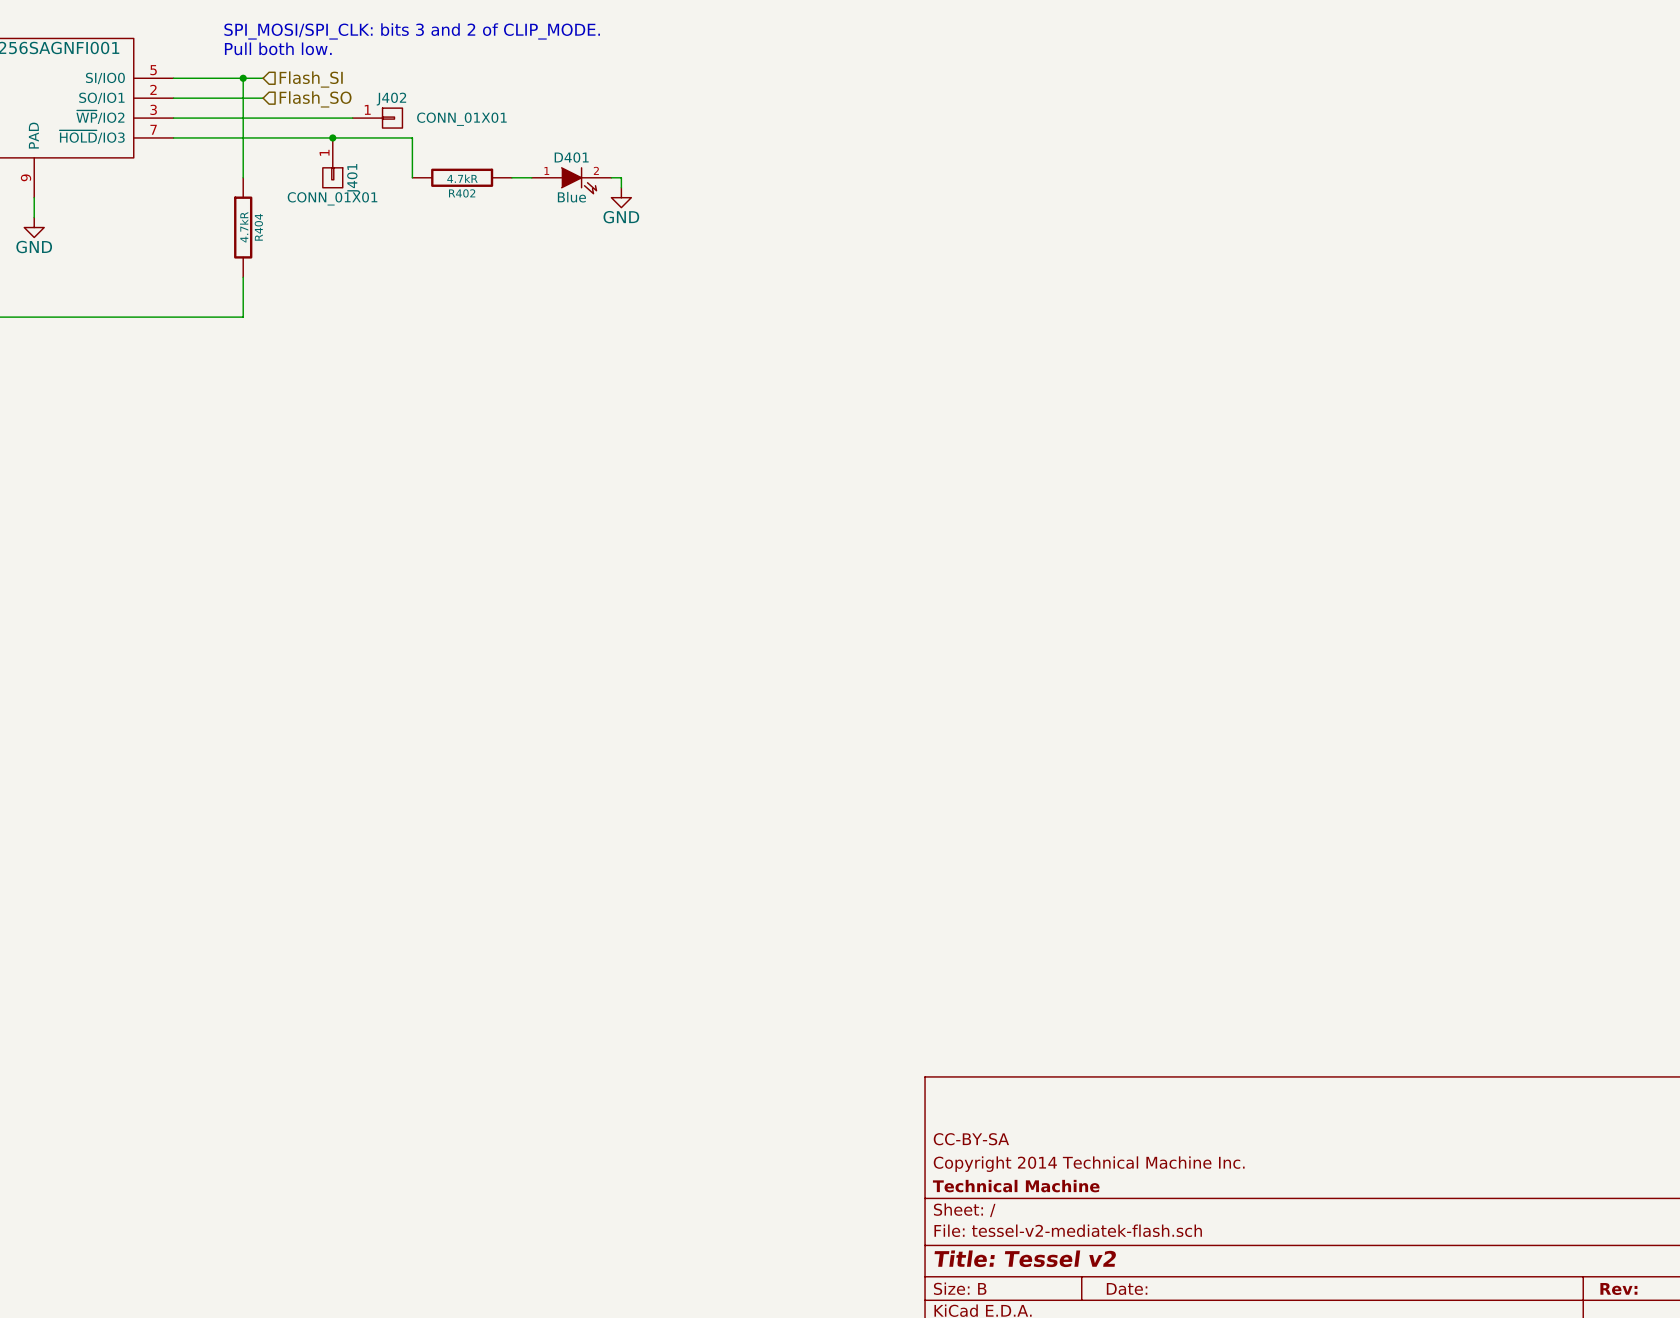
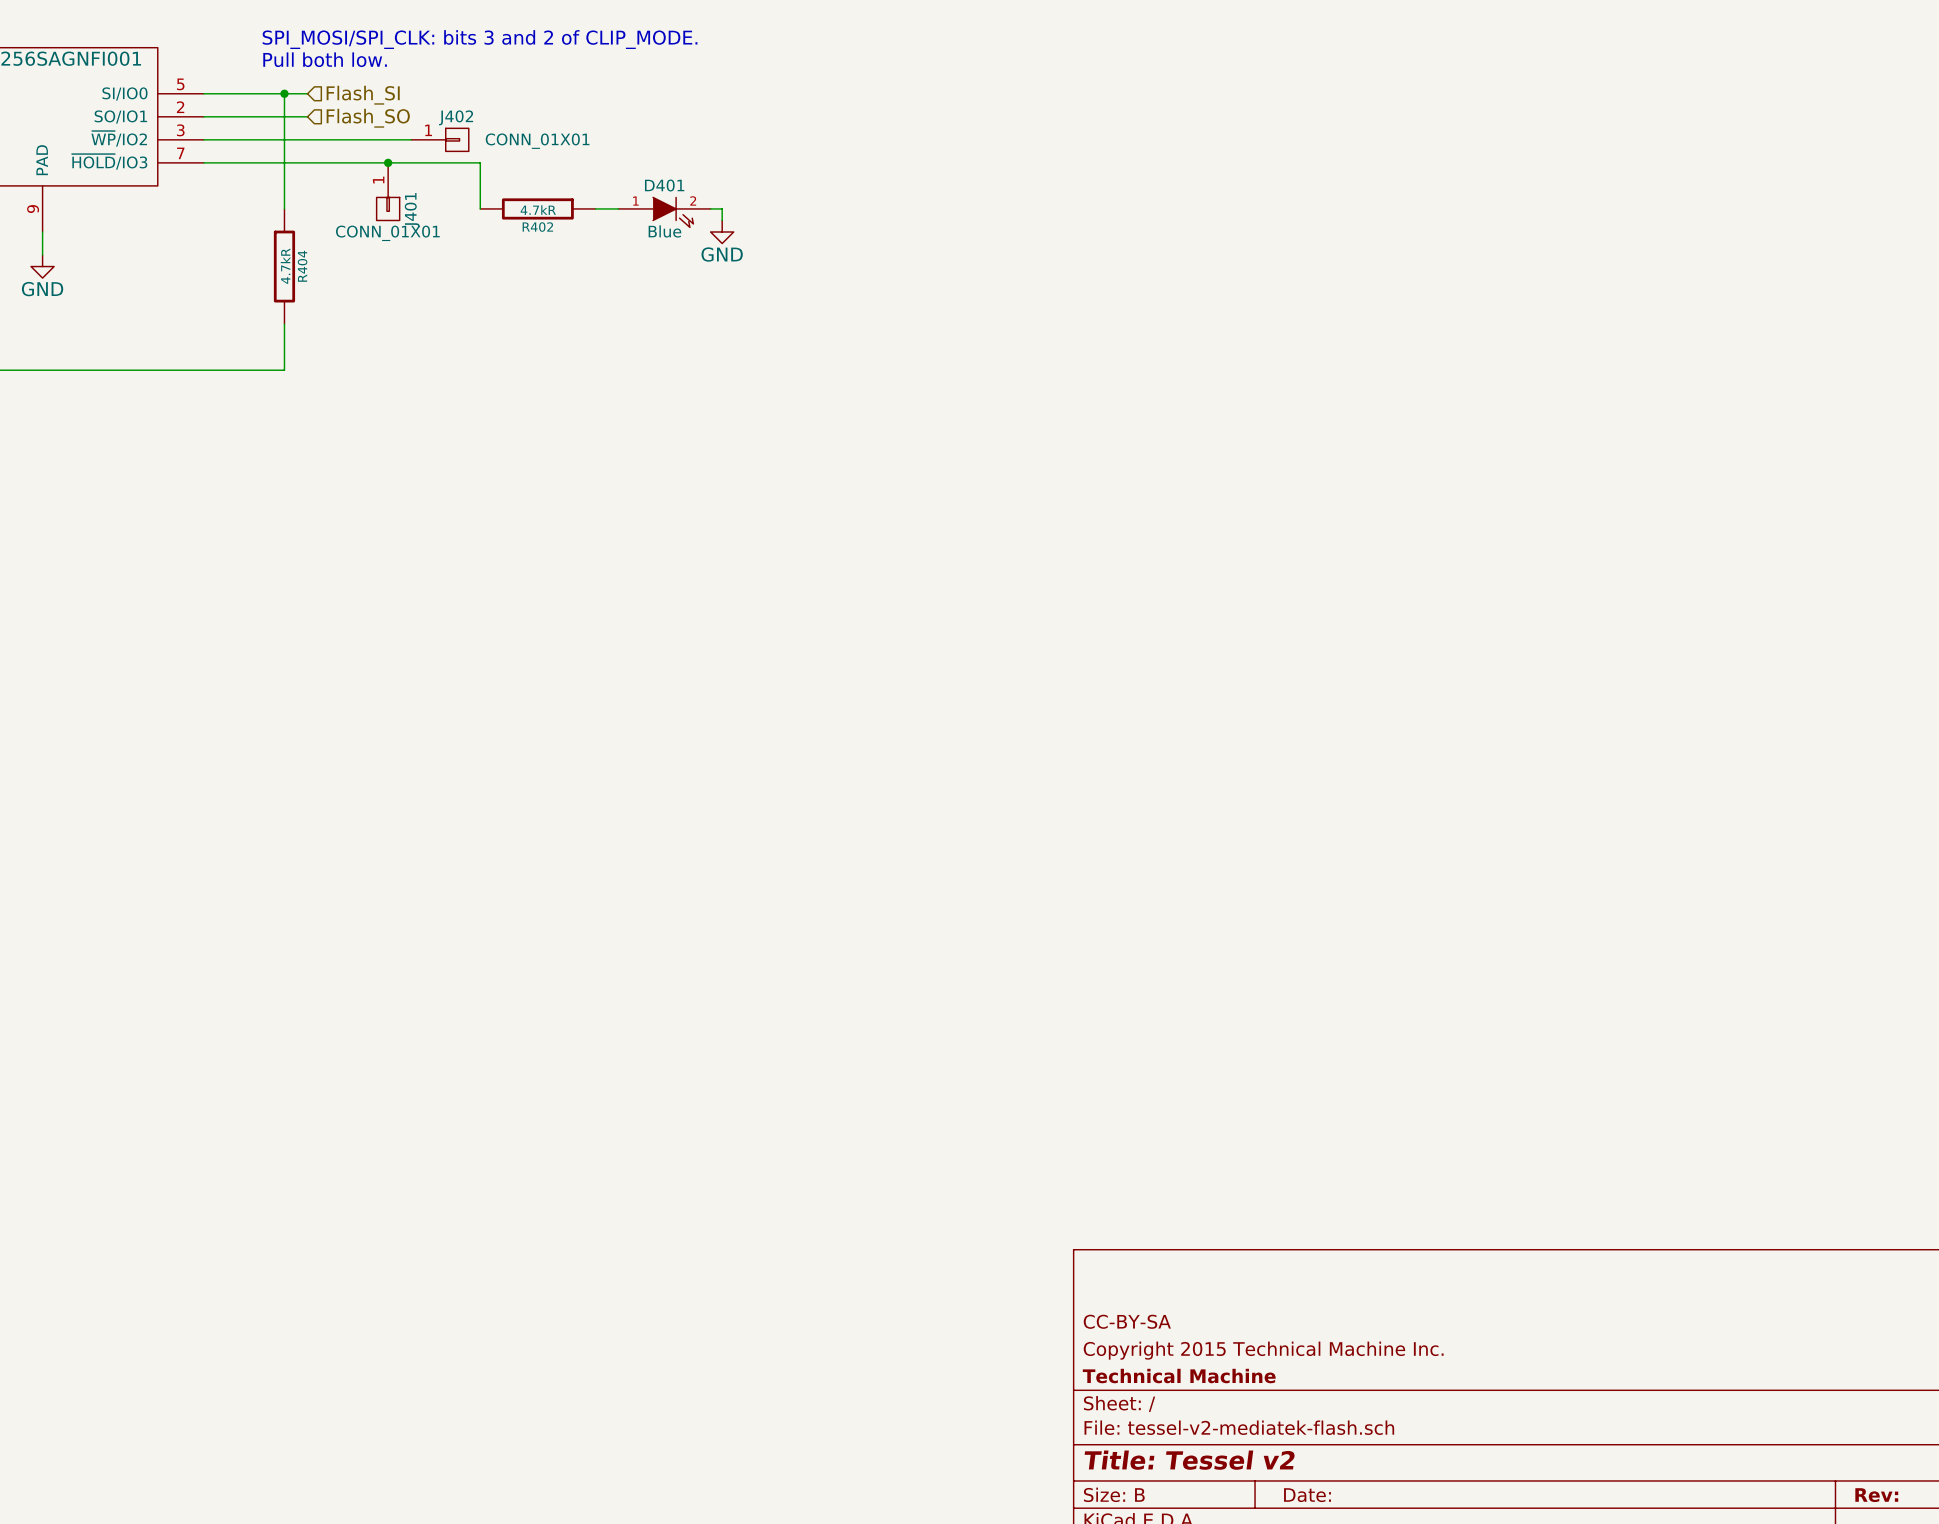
title block: Copyright 2014 Technical Machine Inc. (1089, 1164) -> Copyright 2015 Technical Machine Inc. (1263, 1350)

